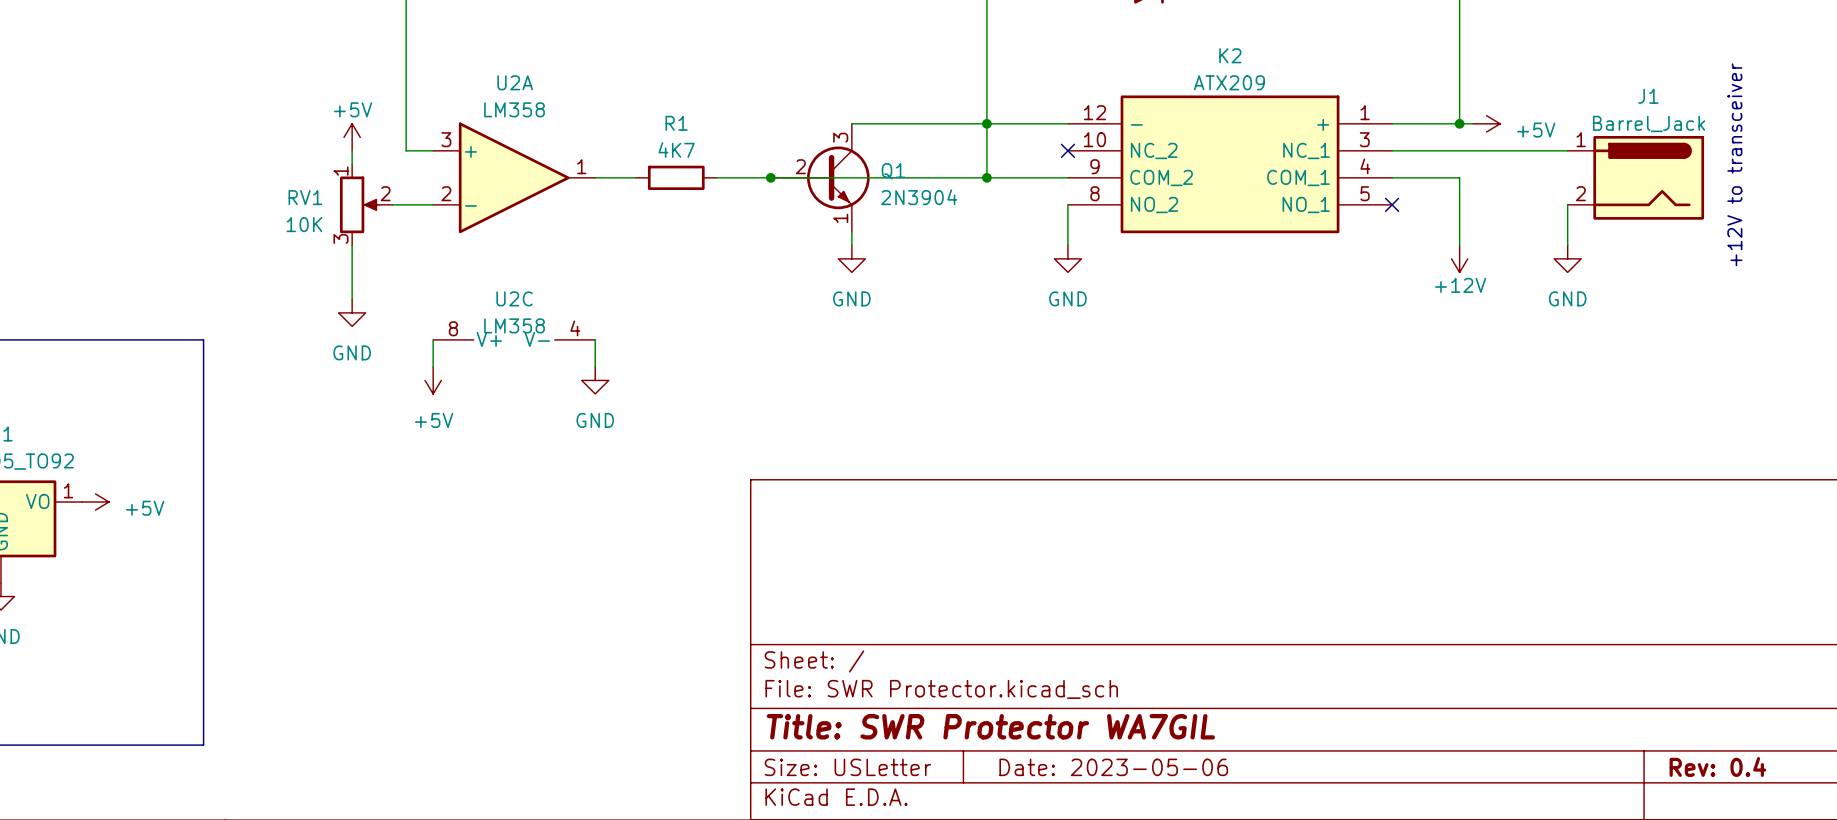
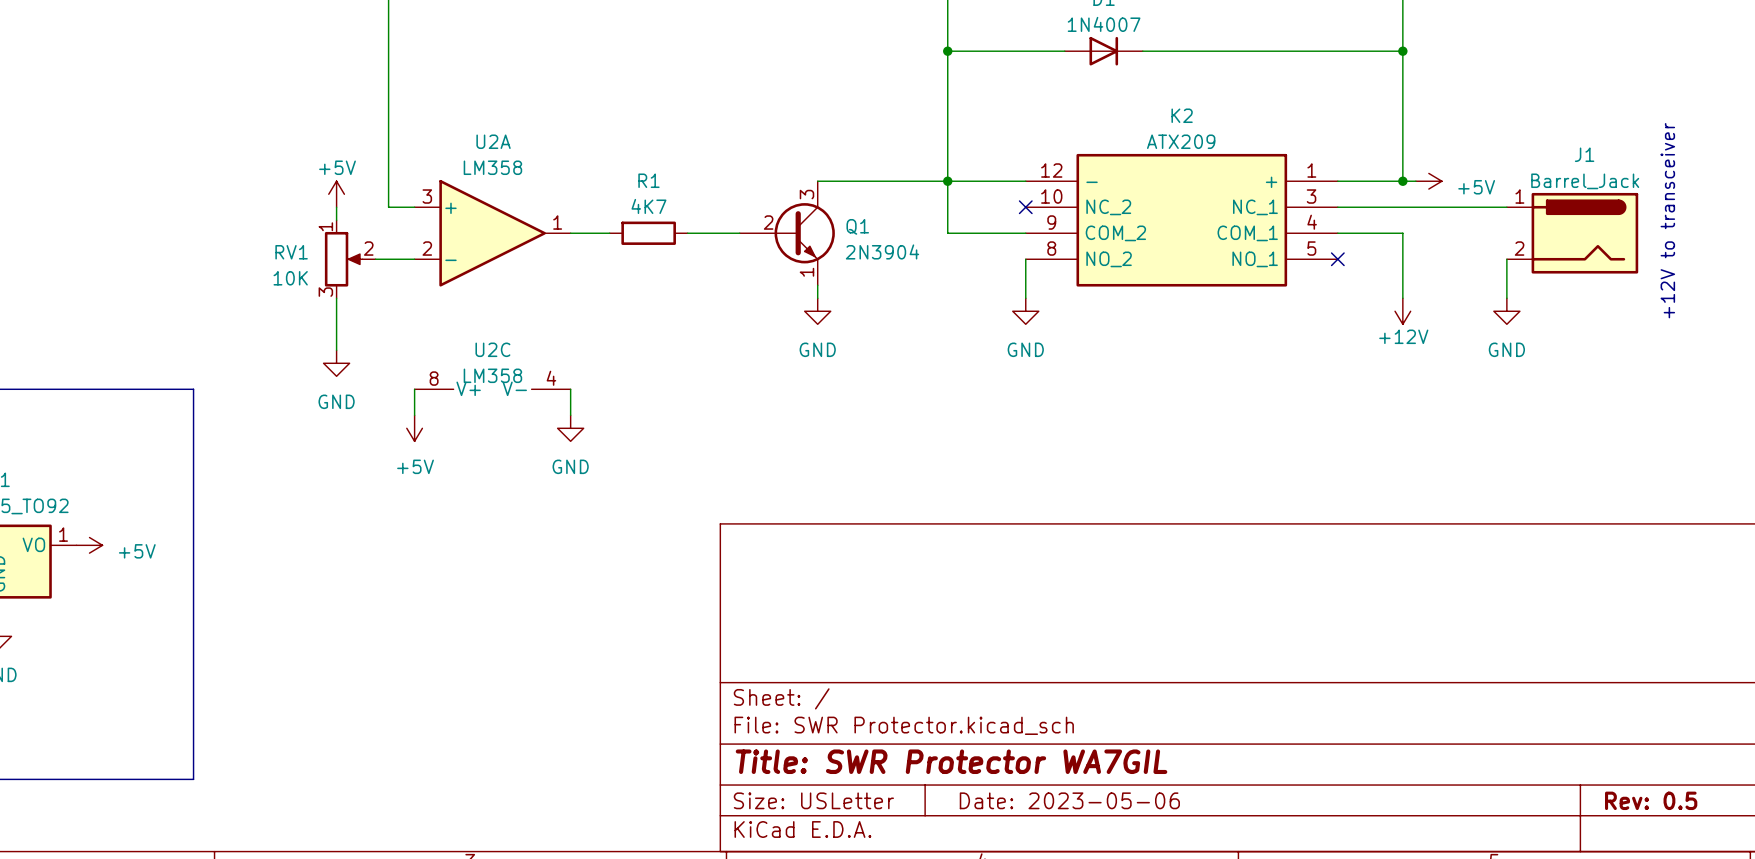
wire: (770, 177) (986, 177) -> none
junction: (770, 177) -> none
junction: (986, 177) -> none
title block: Rev: 0.4 (1717, 766) -> Rev: 0.5 (1651, 800)

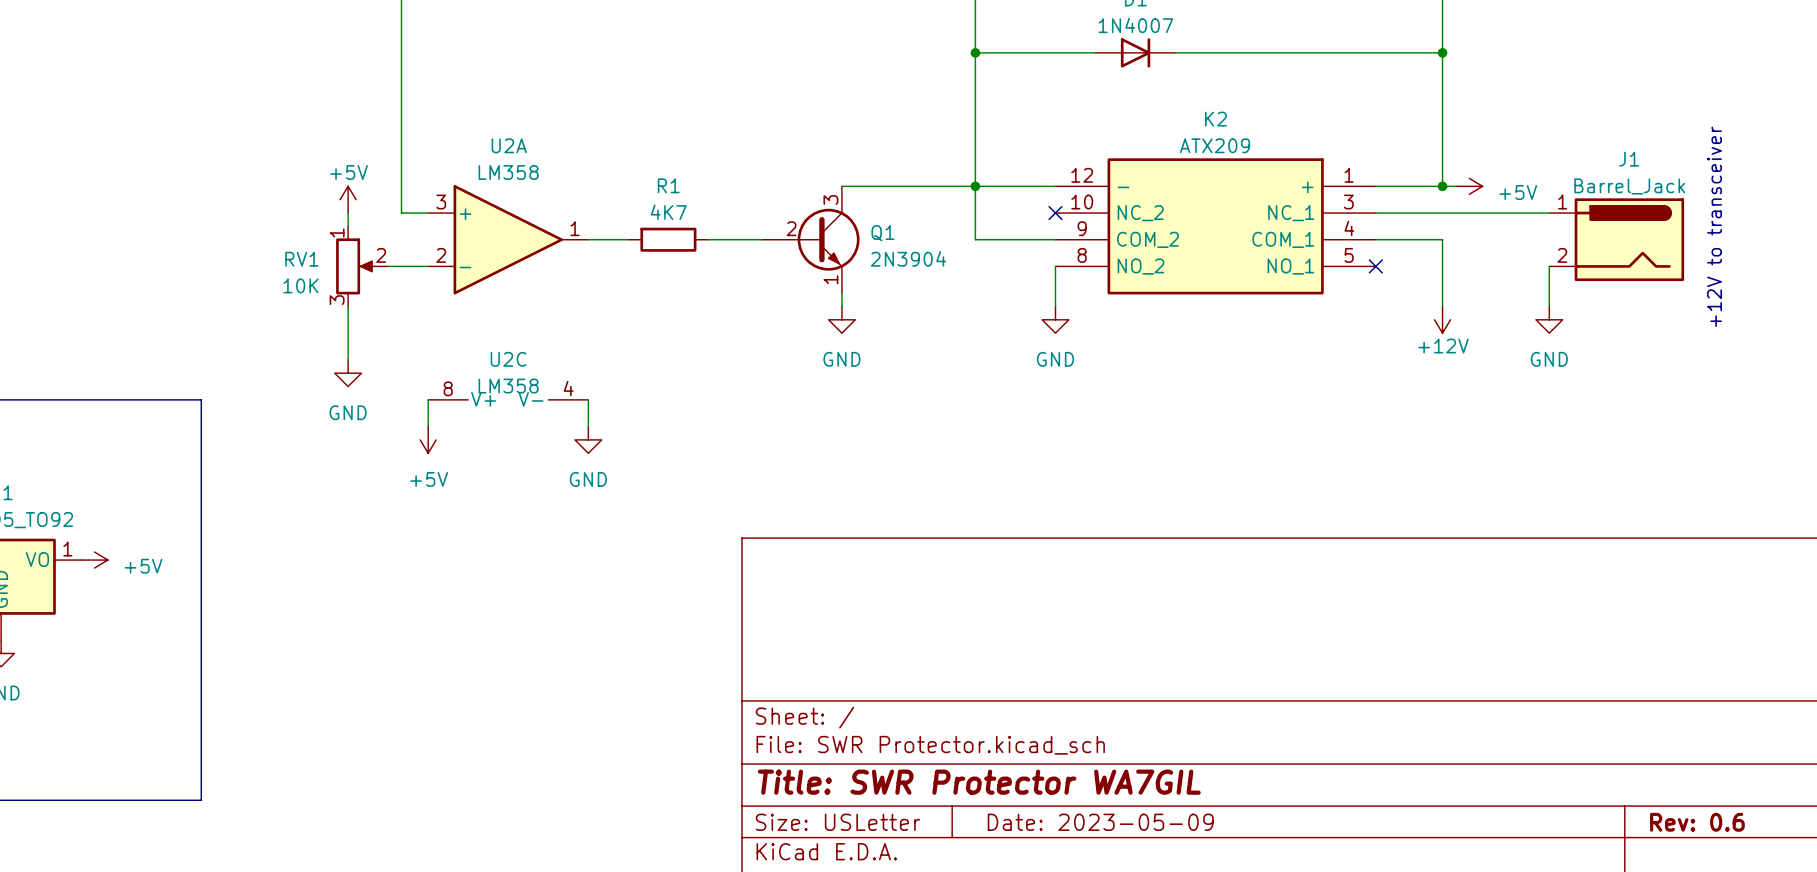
title block: Date: 2023-05-06 (1069, 800) -> Date: 2023-05-09 (1100, 822)
title block: Rev: 0.5 (1651, 800) -> Rev: 0.6 (1697, 822)

